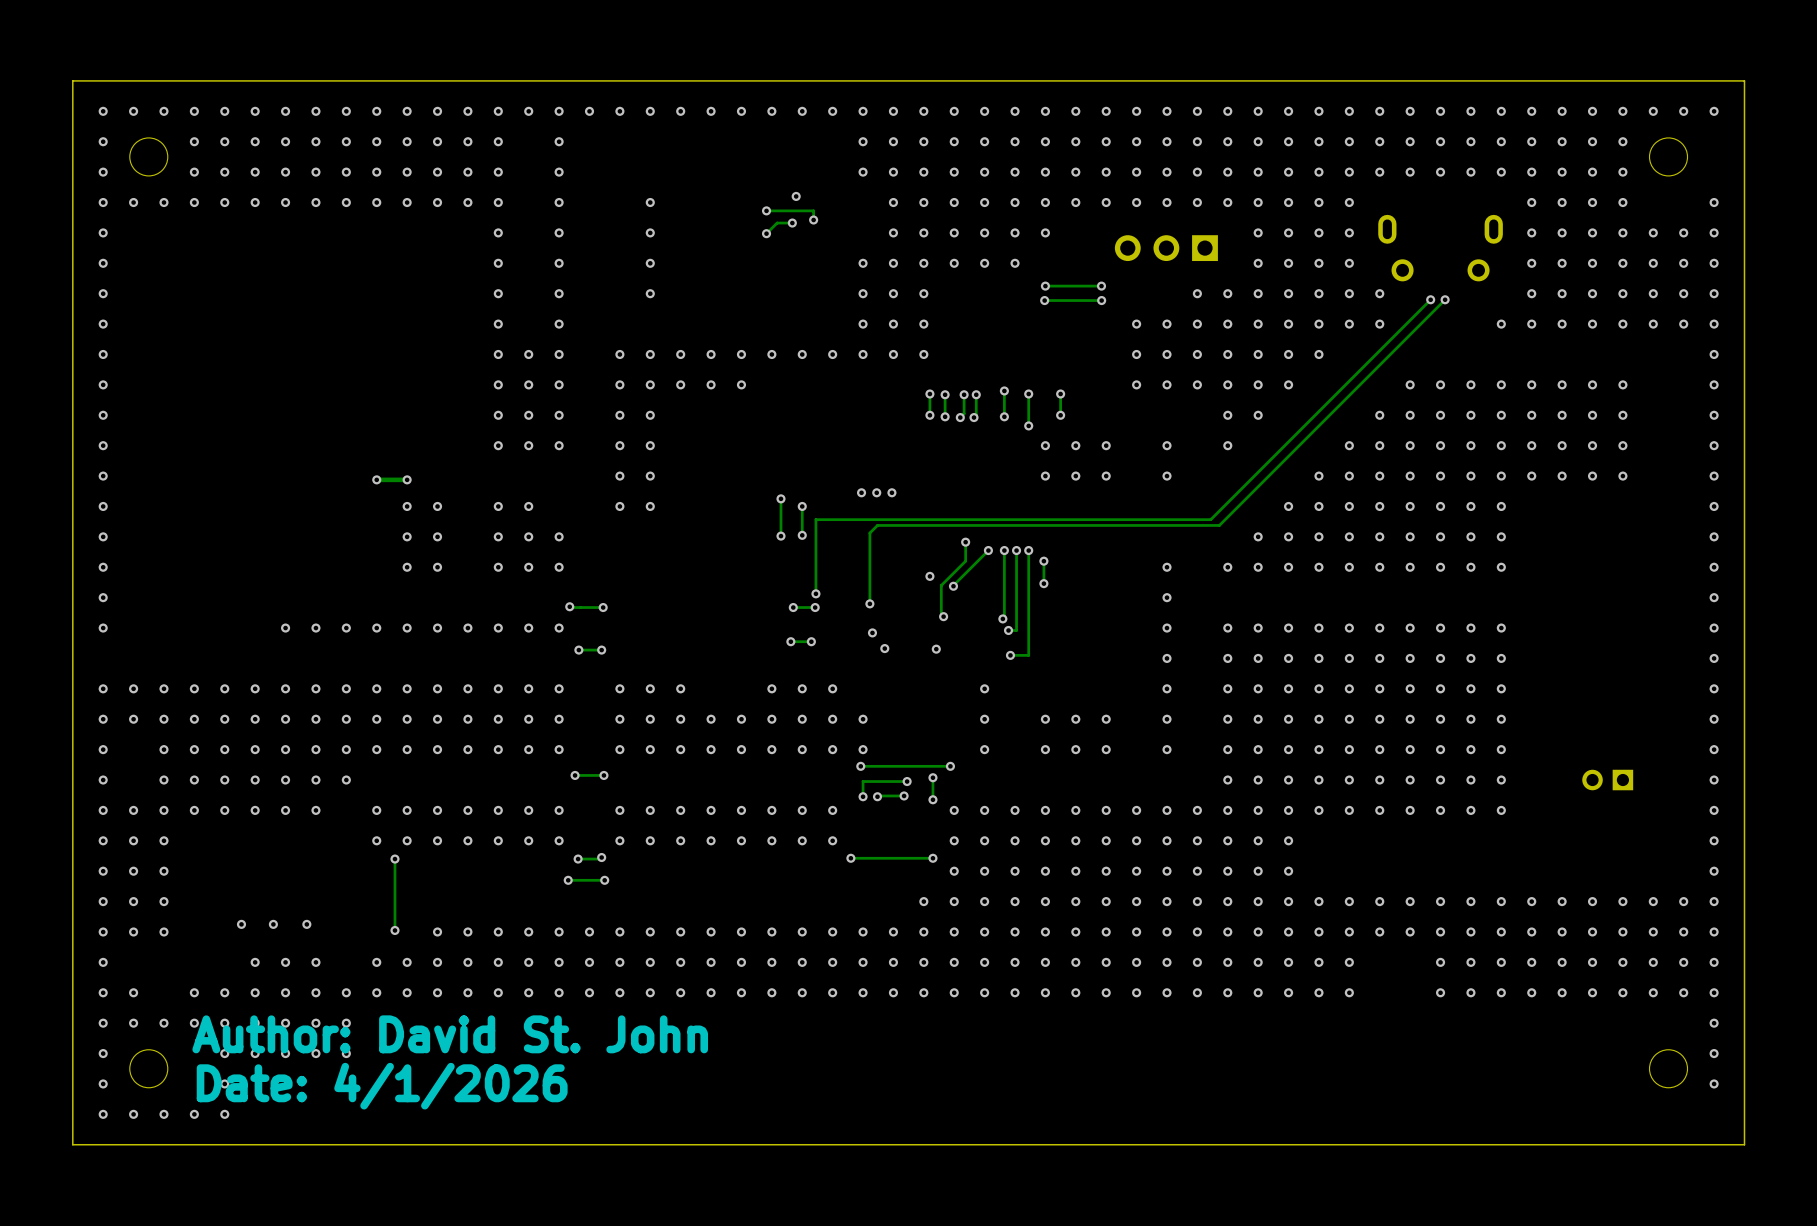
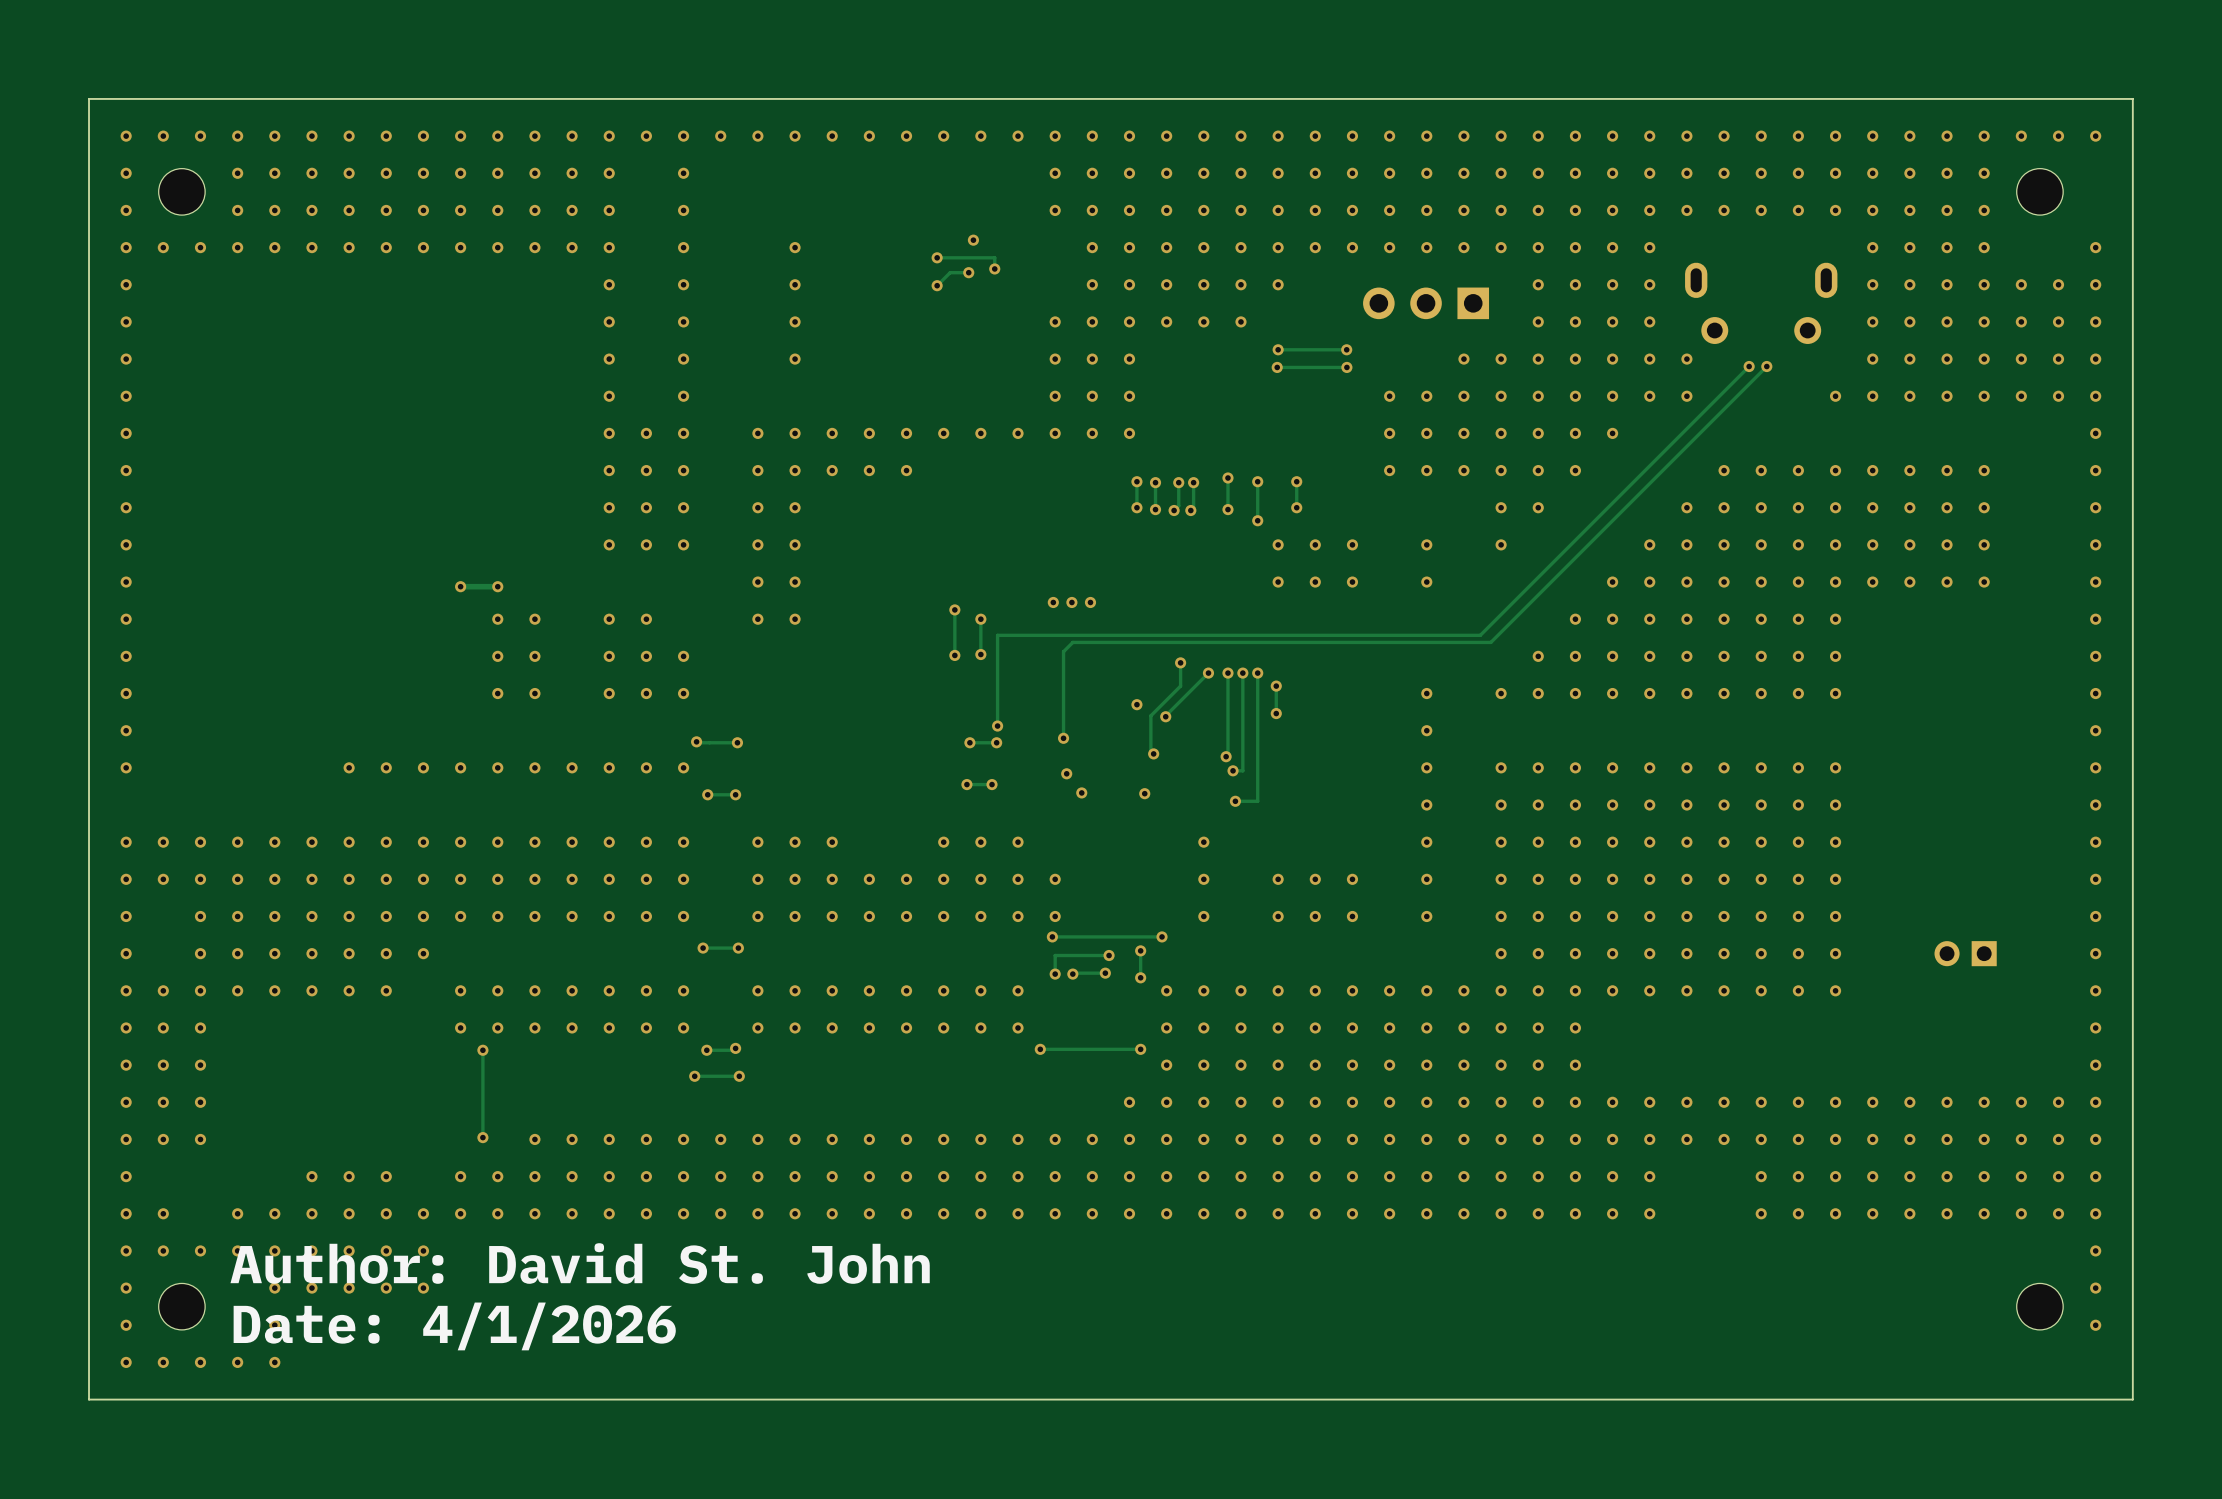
via: (241, 924) -> none
via: (273, 924) -> none
via: (306, 924) -> none

